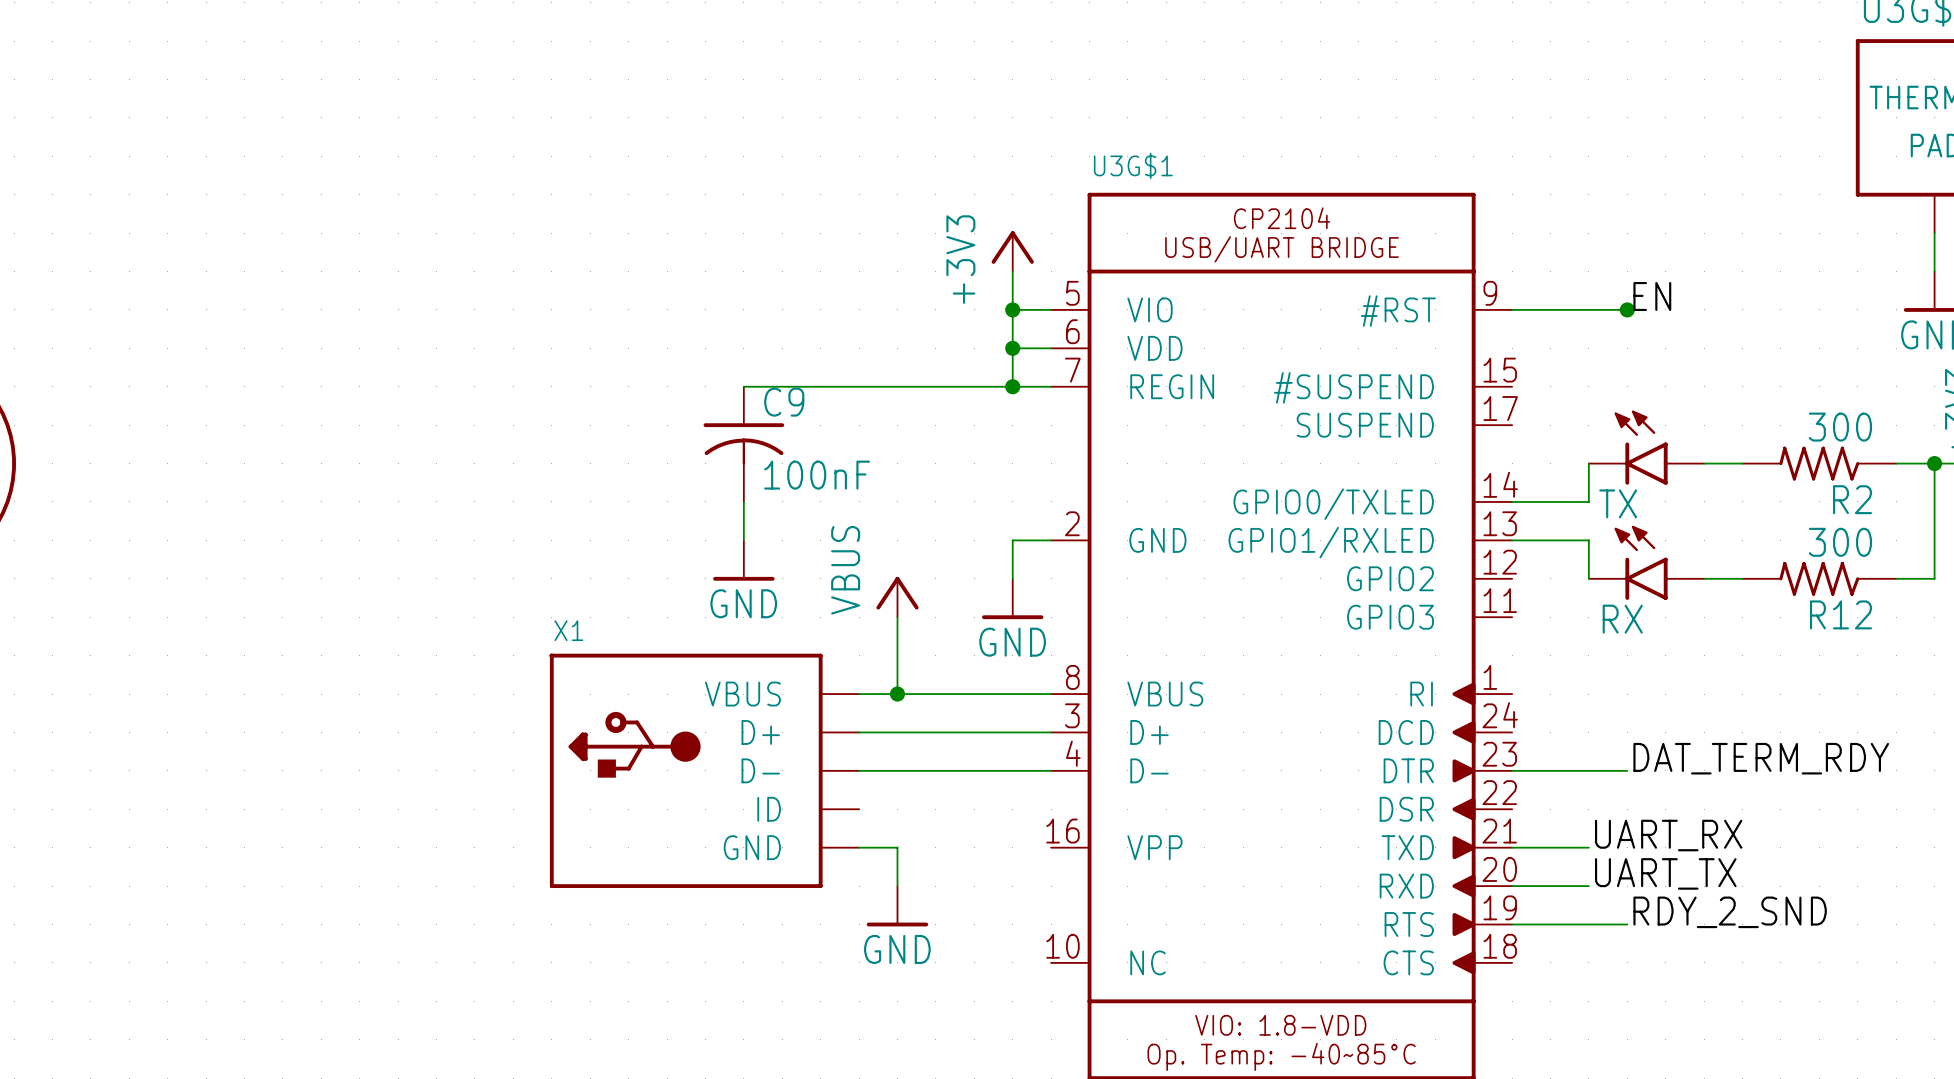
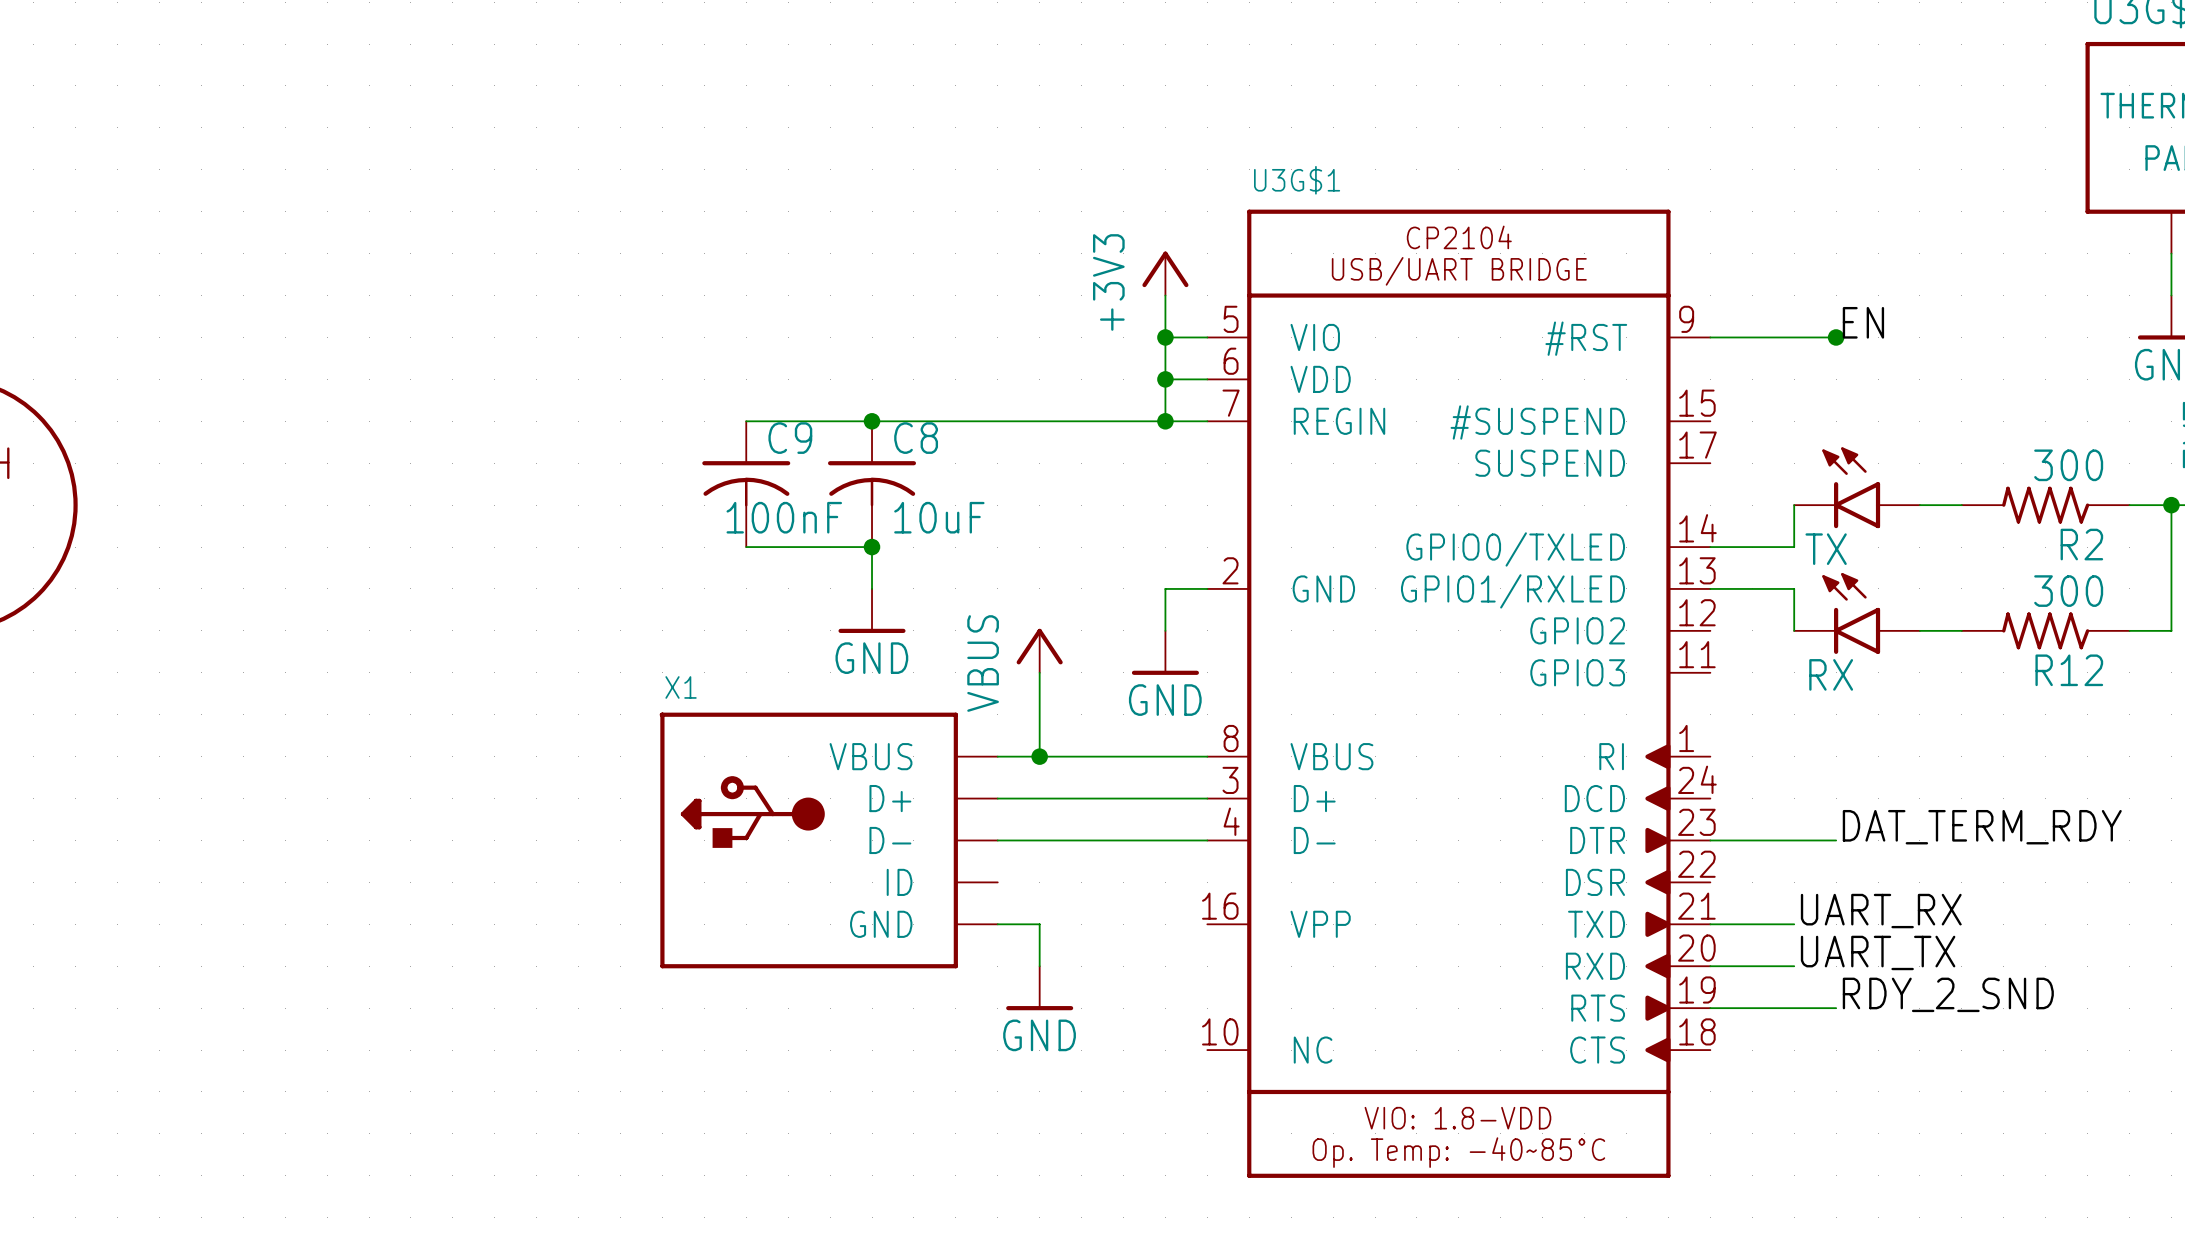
wire: none -> (746, 421) (872, 421)
junction: none -> (872, 421)
C9 name: C9 (784, 402) -> C8 (916, 438)
C9: none -> 100nF (746, 484)
C9 value: 100nF (817, 475) -> 10uF (939, 517)
wire: none -> (746, 547) (872, 547)
junction: none -> (872, 547)
power symbol text position: VBUS (845, 570) -> VBUS (983, 663)

